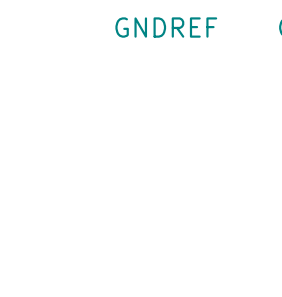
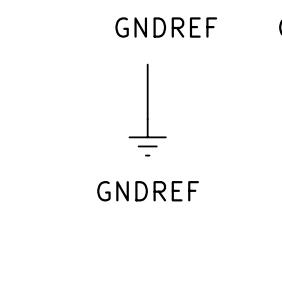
wire: none -> (147, 64) (147, 119)
power symbol: none -> GNDREF (147, 137)

